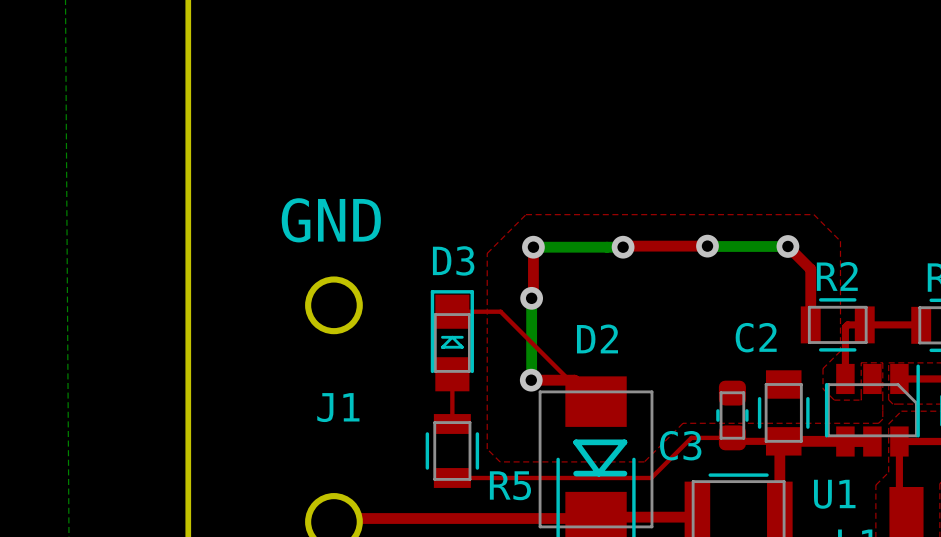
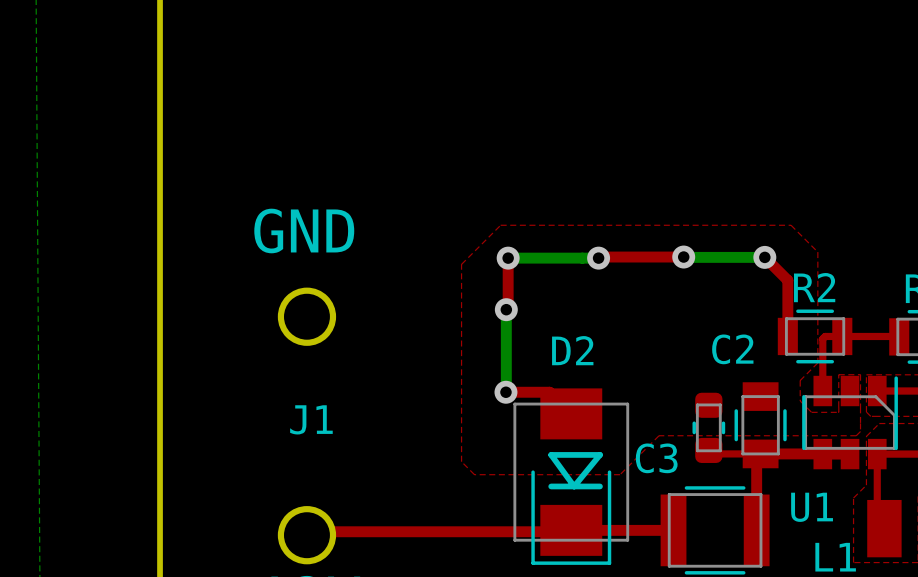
top track: (452, 311) (500, 311) (590, 401) (596, 401) -> none
D3: (452, 340) -> none
top track: (452, 374) (452, 423) -> none
top track: (732, 437) (691, 437) (651, 478) (452, 478) -> none
R5: (452, 450) -> none

